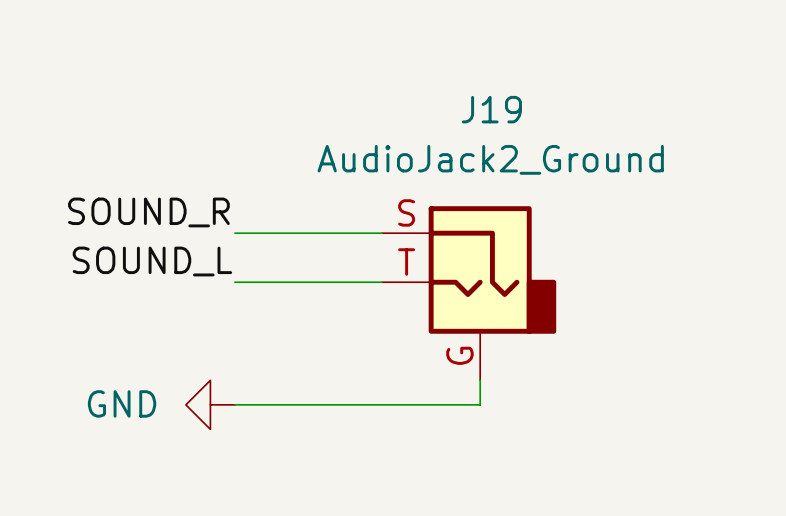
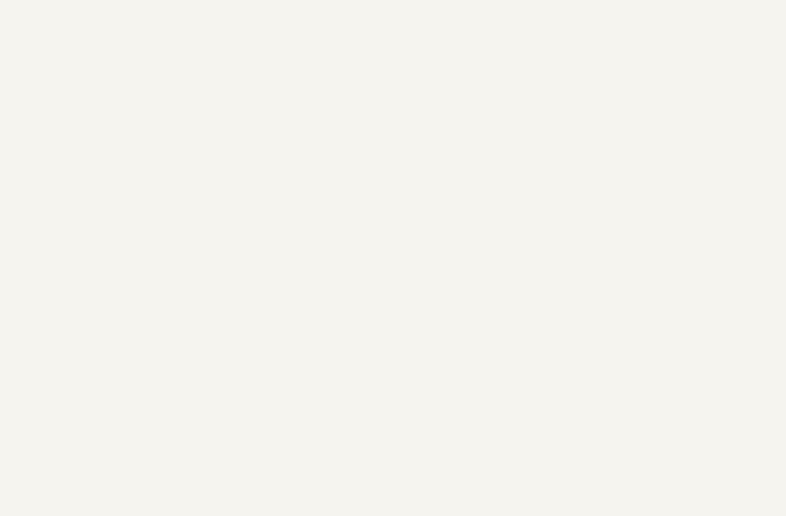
label: SOUND_R (148, 212) -> none
wire: (234, 233) (382, 233) -> none
label: SOUND_L (152, 261) -> none
wire: (234, 282) (382, 282) -> none
J19: AudioJack2_Ground (469, 293) -> none
wire: (480, 380) (480, 404) (234, 404) -> none
power symbol: GND (210, 404) -> none

